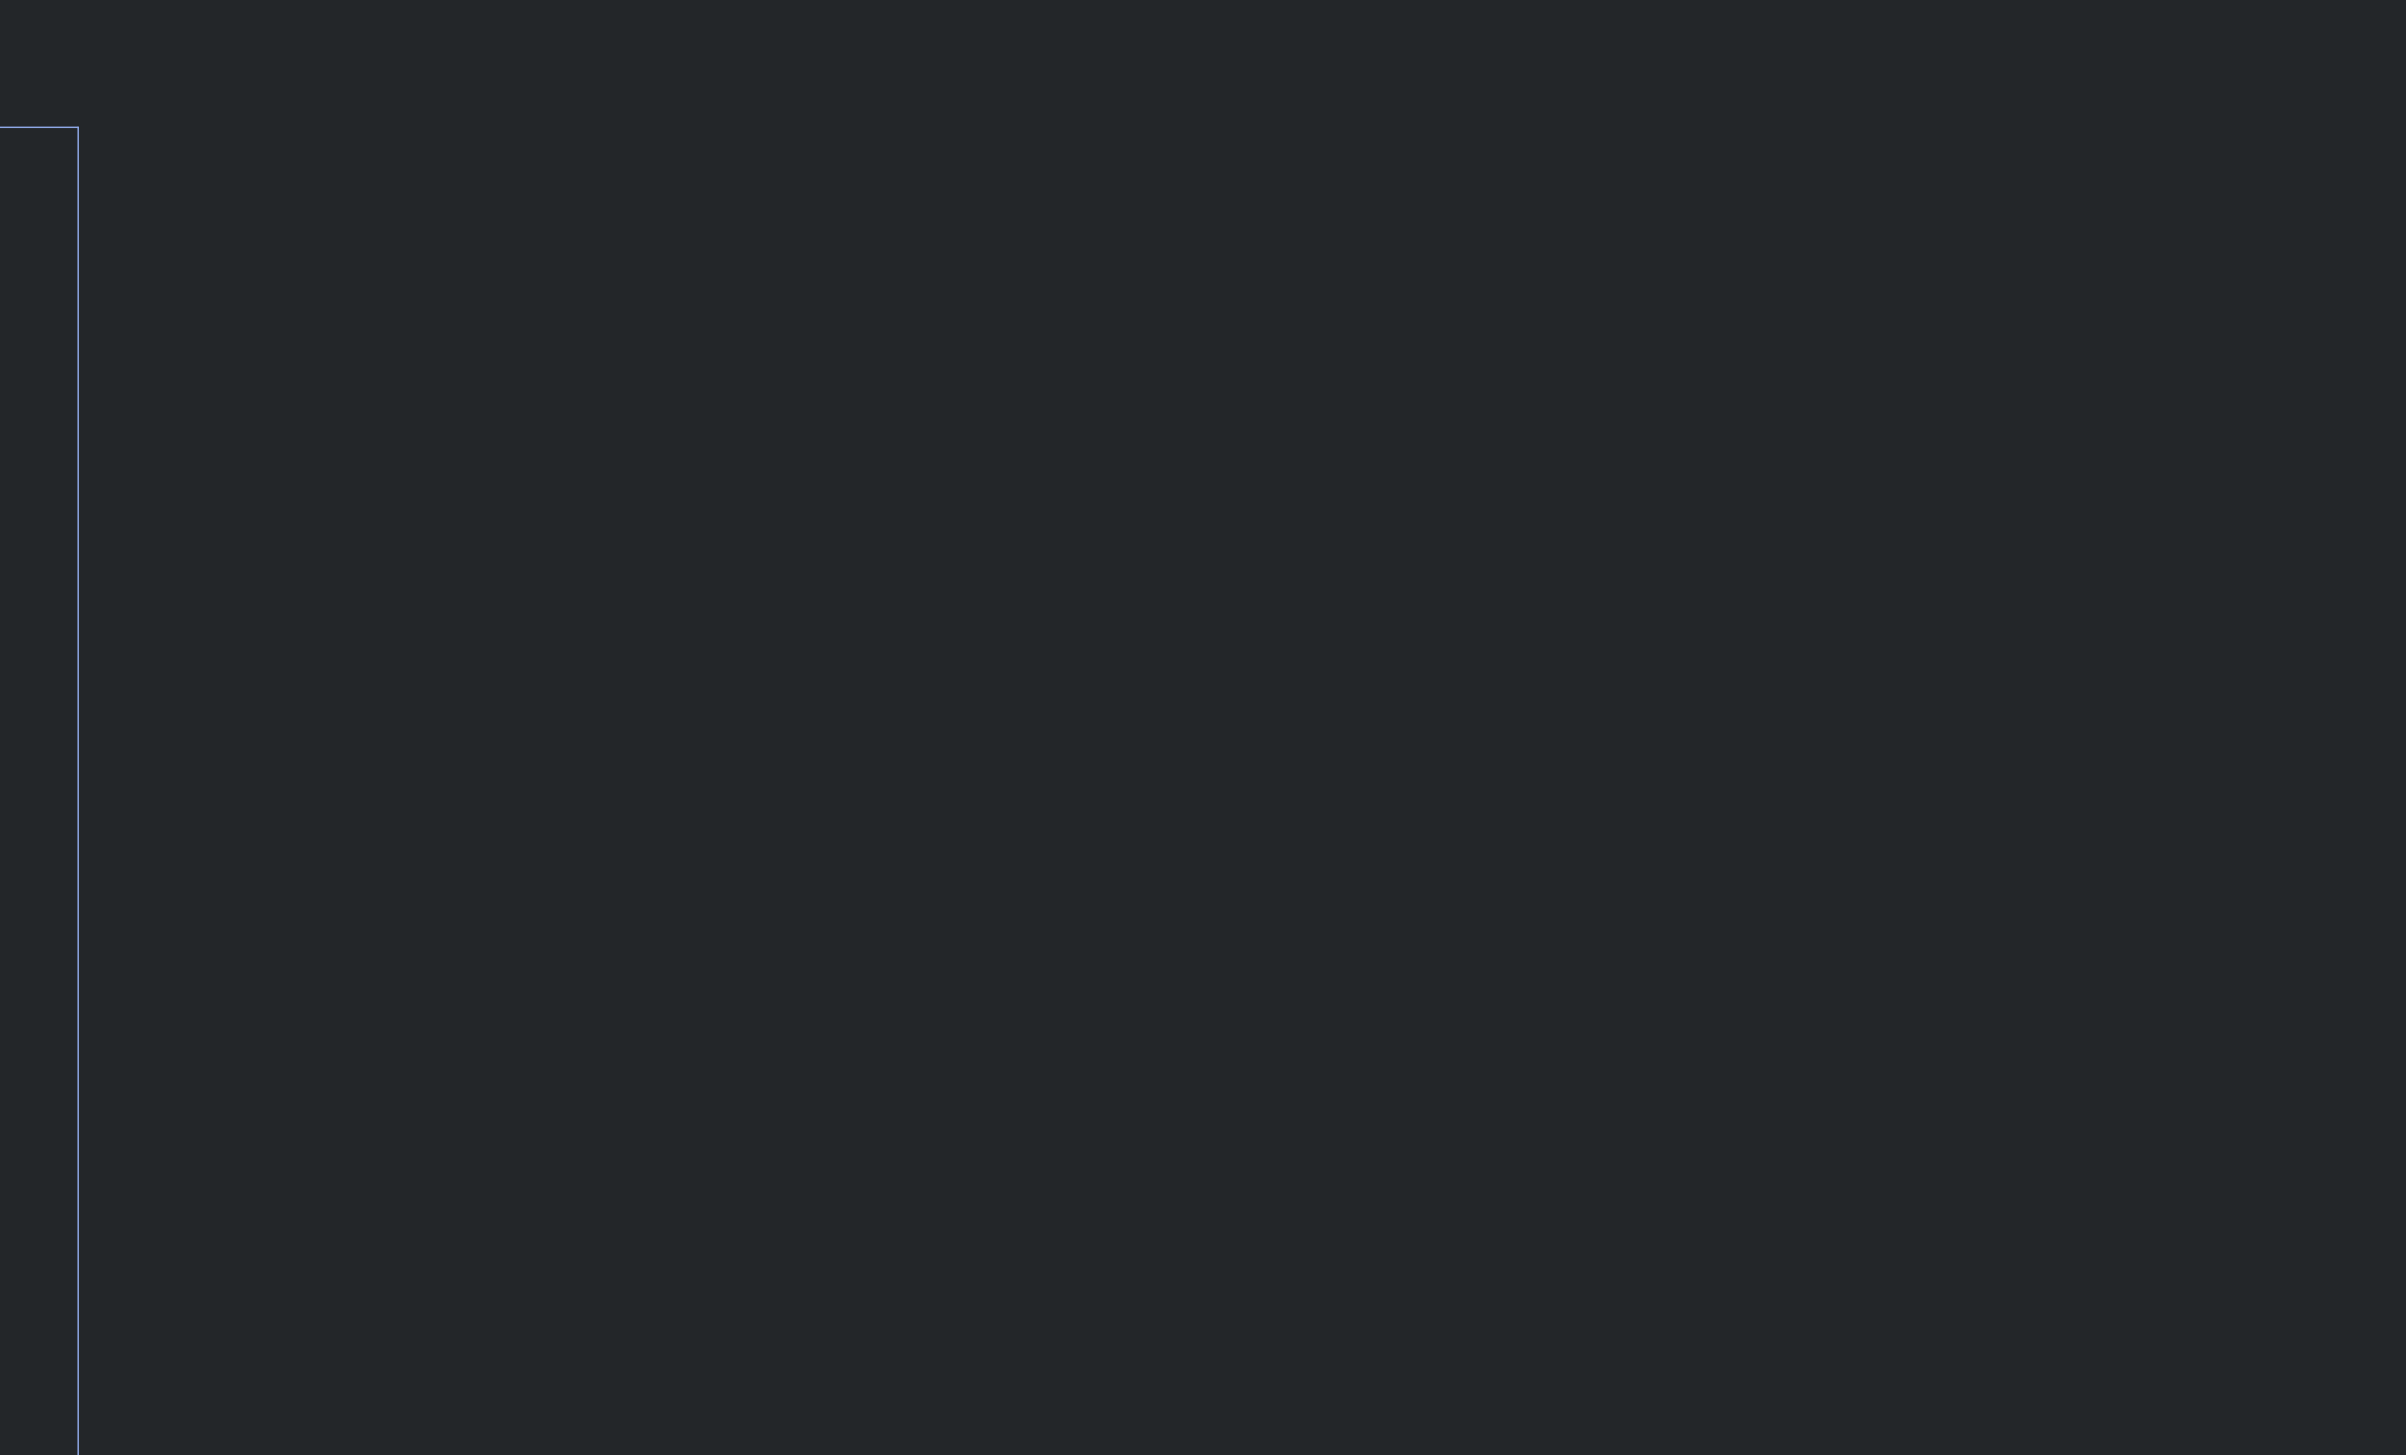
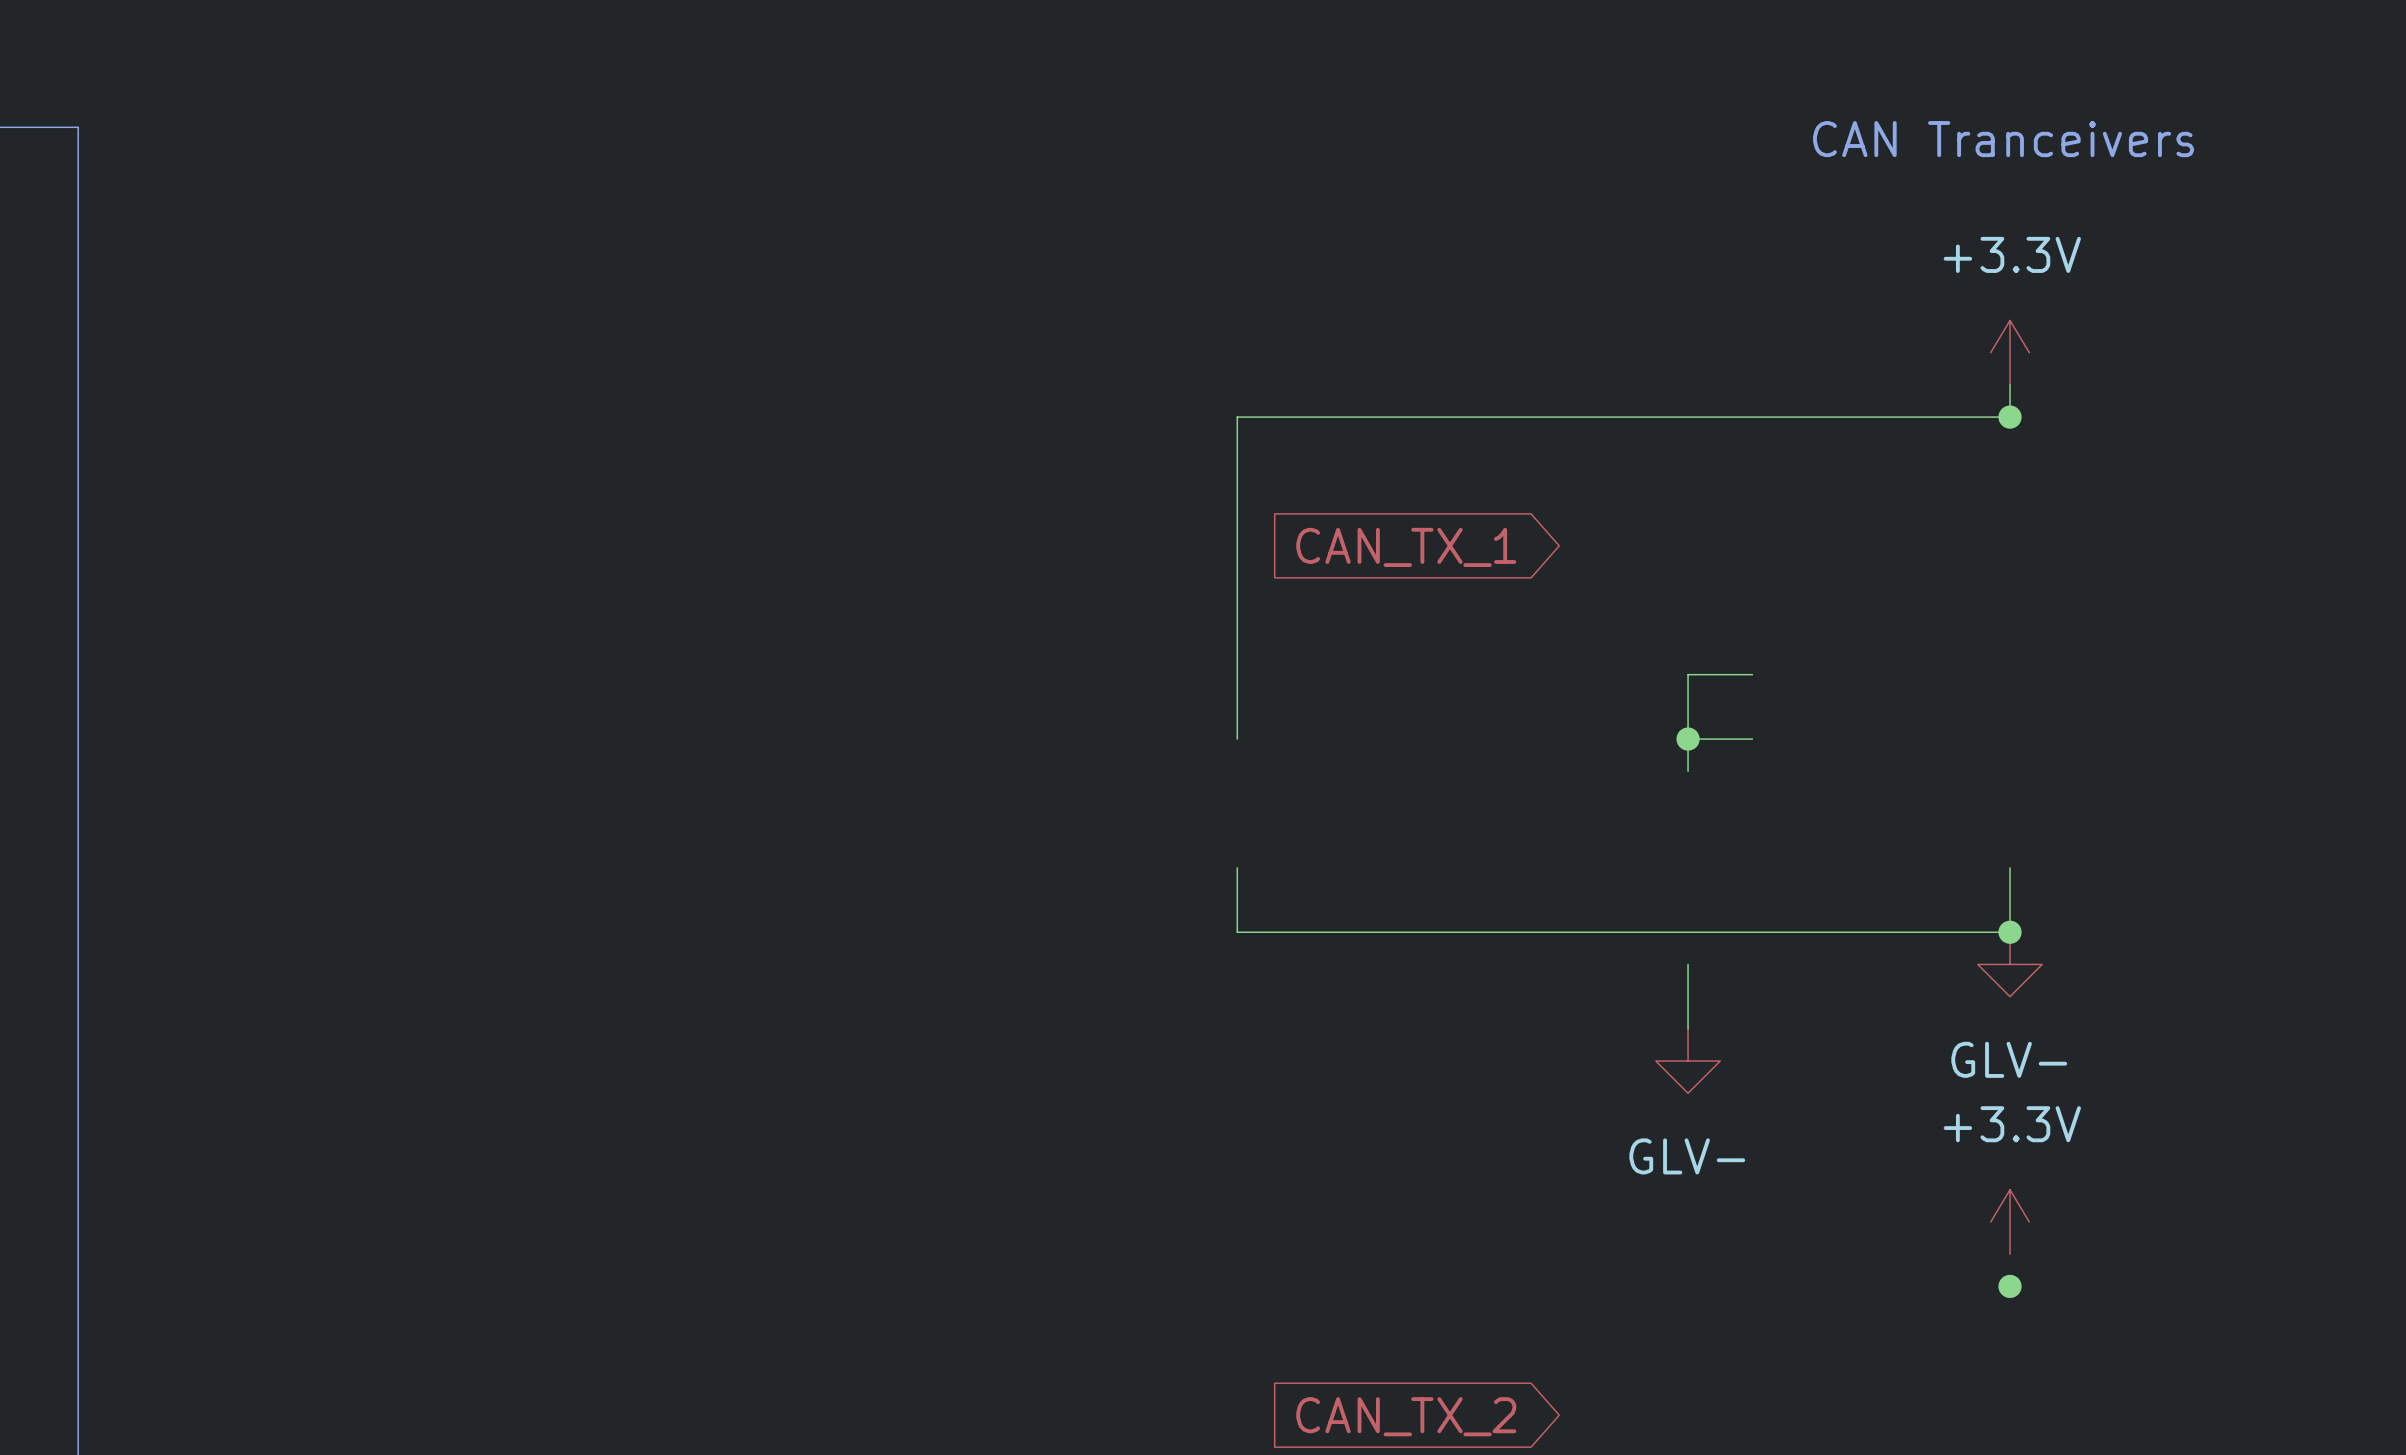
text: none -> CAN Tranceivers (2003, 139)
power symbol: none -> +3.3V (2010, 352)
wire: none -> (2010, 384) (2010, 417) (1237, 417) (1237, 739)
junction: none -> (2010, 417)
global label: none -> CAN_TX_1 (1406, 547)
wire: none -> (1752, 674) (1688, 674) (1688, 771)
wire: none -> (1688, 739) (1752, 739)
junction: none -> (1688, 739)
wire: none -> (1237, 867) (1237, 932) (2010, 932) (2010, 867)
junction: none -> (2010, 932)
wire: none -> (1688, 964) (1688, 1028)
power symbol: none -> GLV- (2010, 964)
power symbol: none -> GLV- (1688, 1061)
power symbol: none -> +3.3V (2010, 1222)
junction: none -> (2010, 1286)
global label: none -> CAN_TX_2 (1406, 1416)

